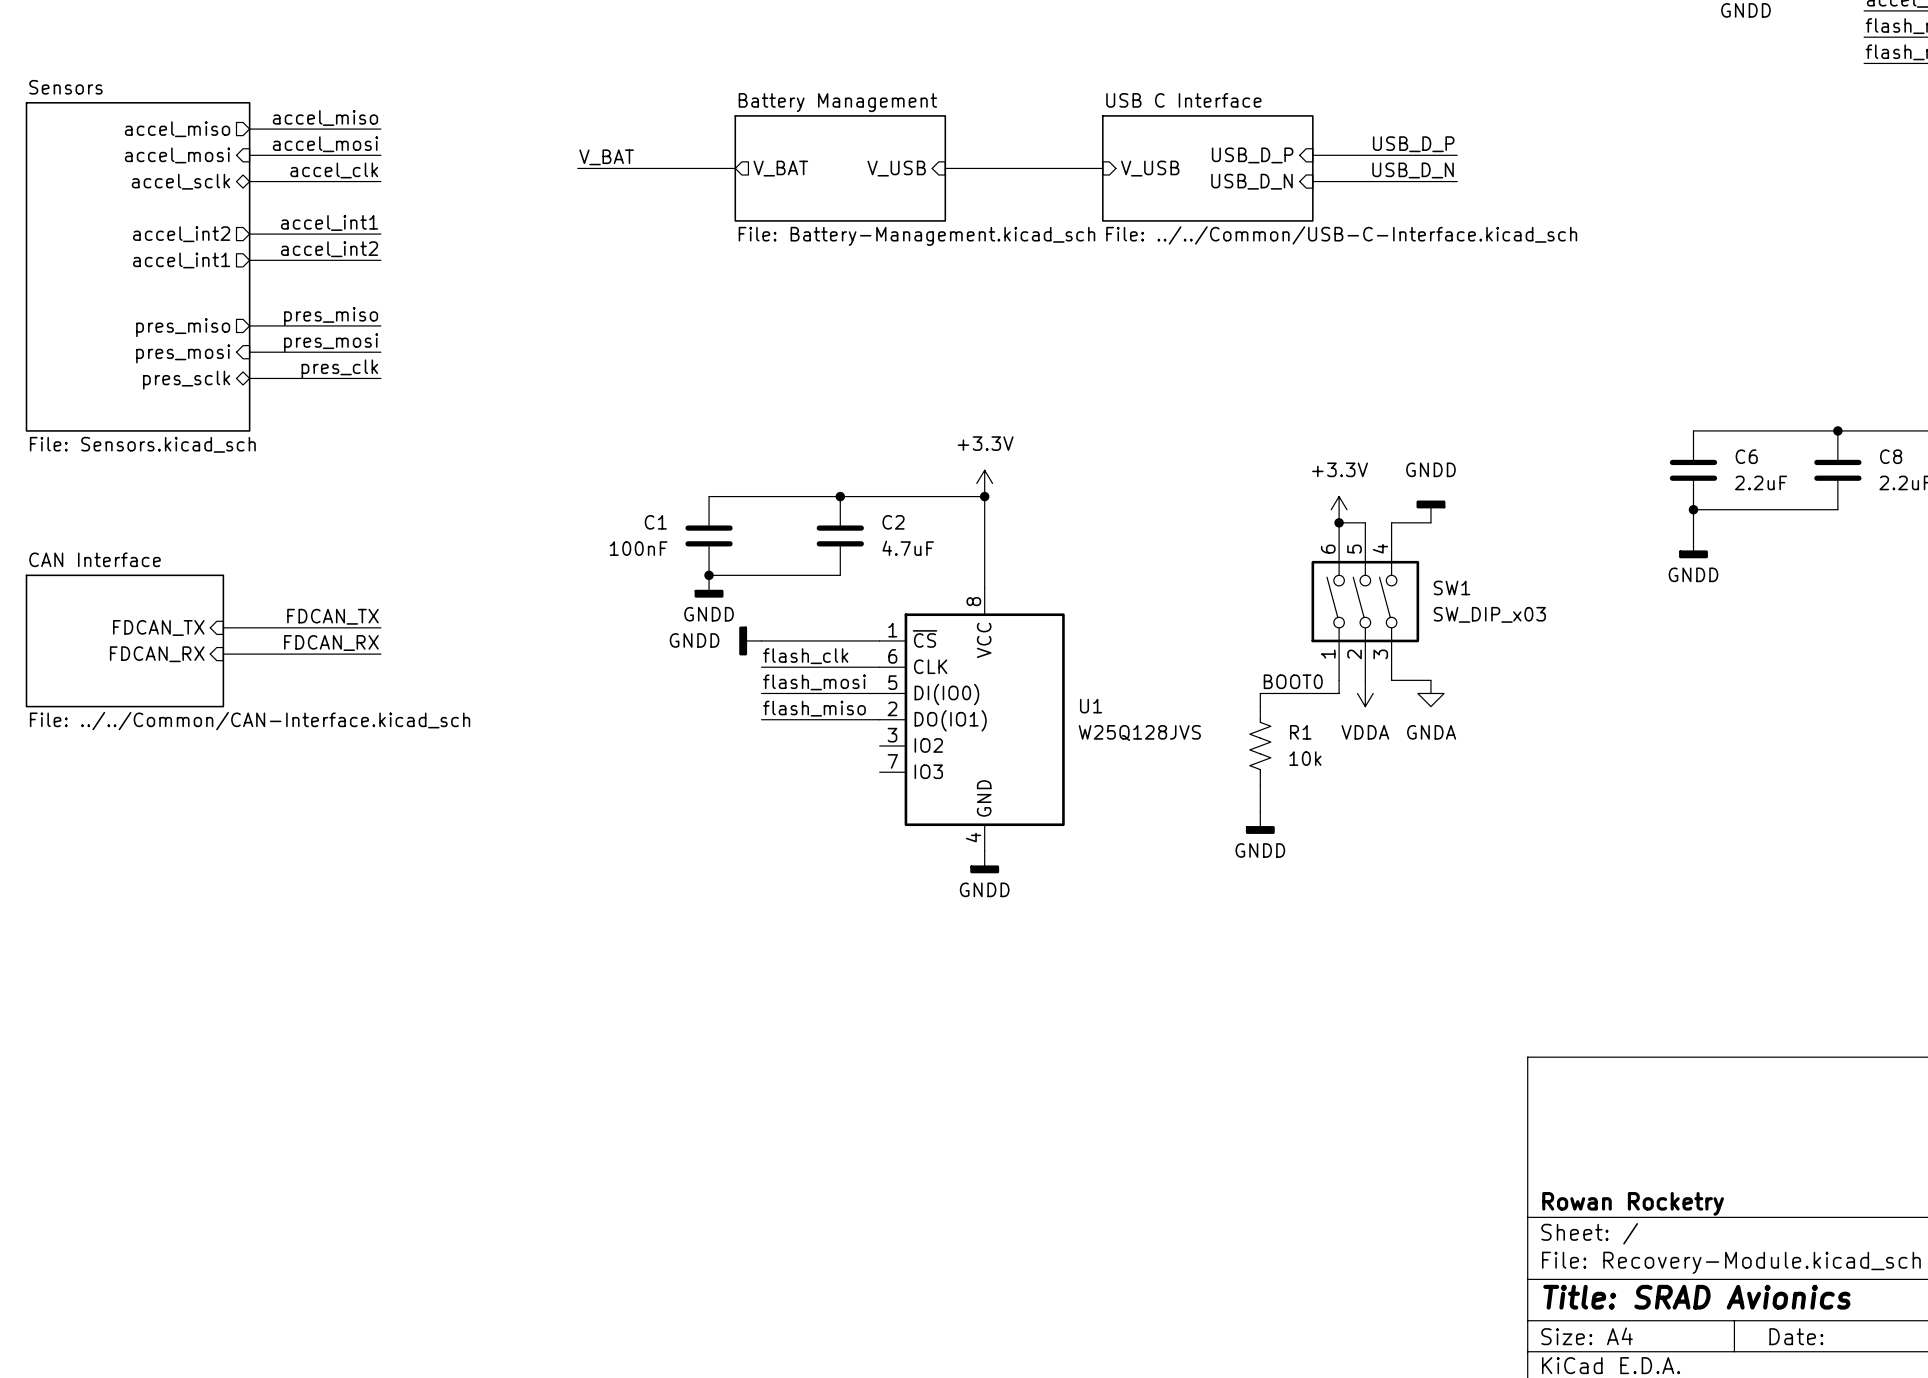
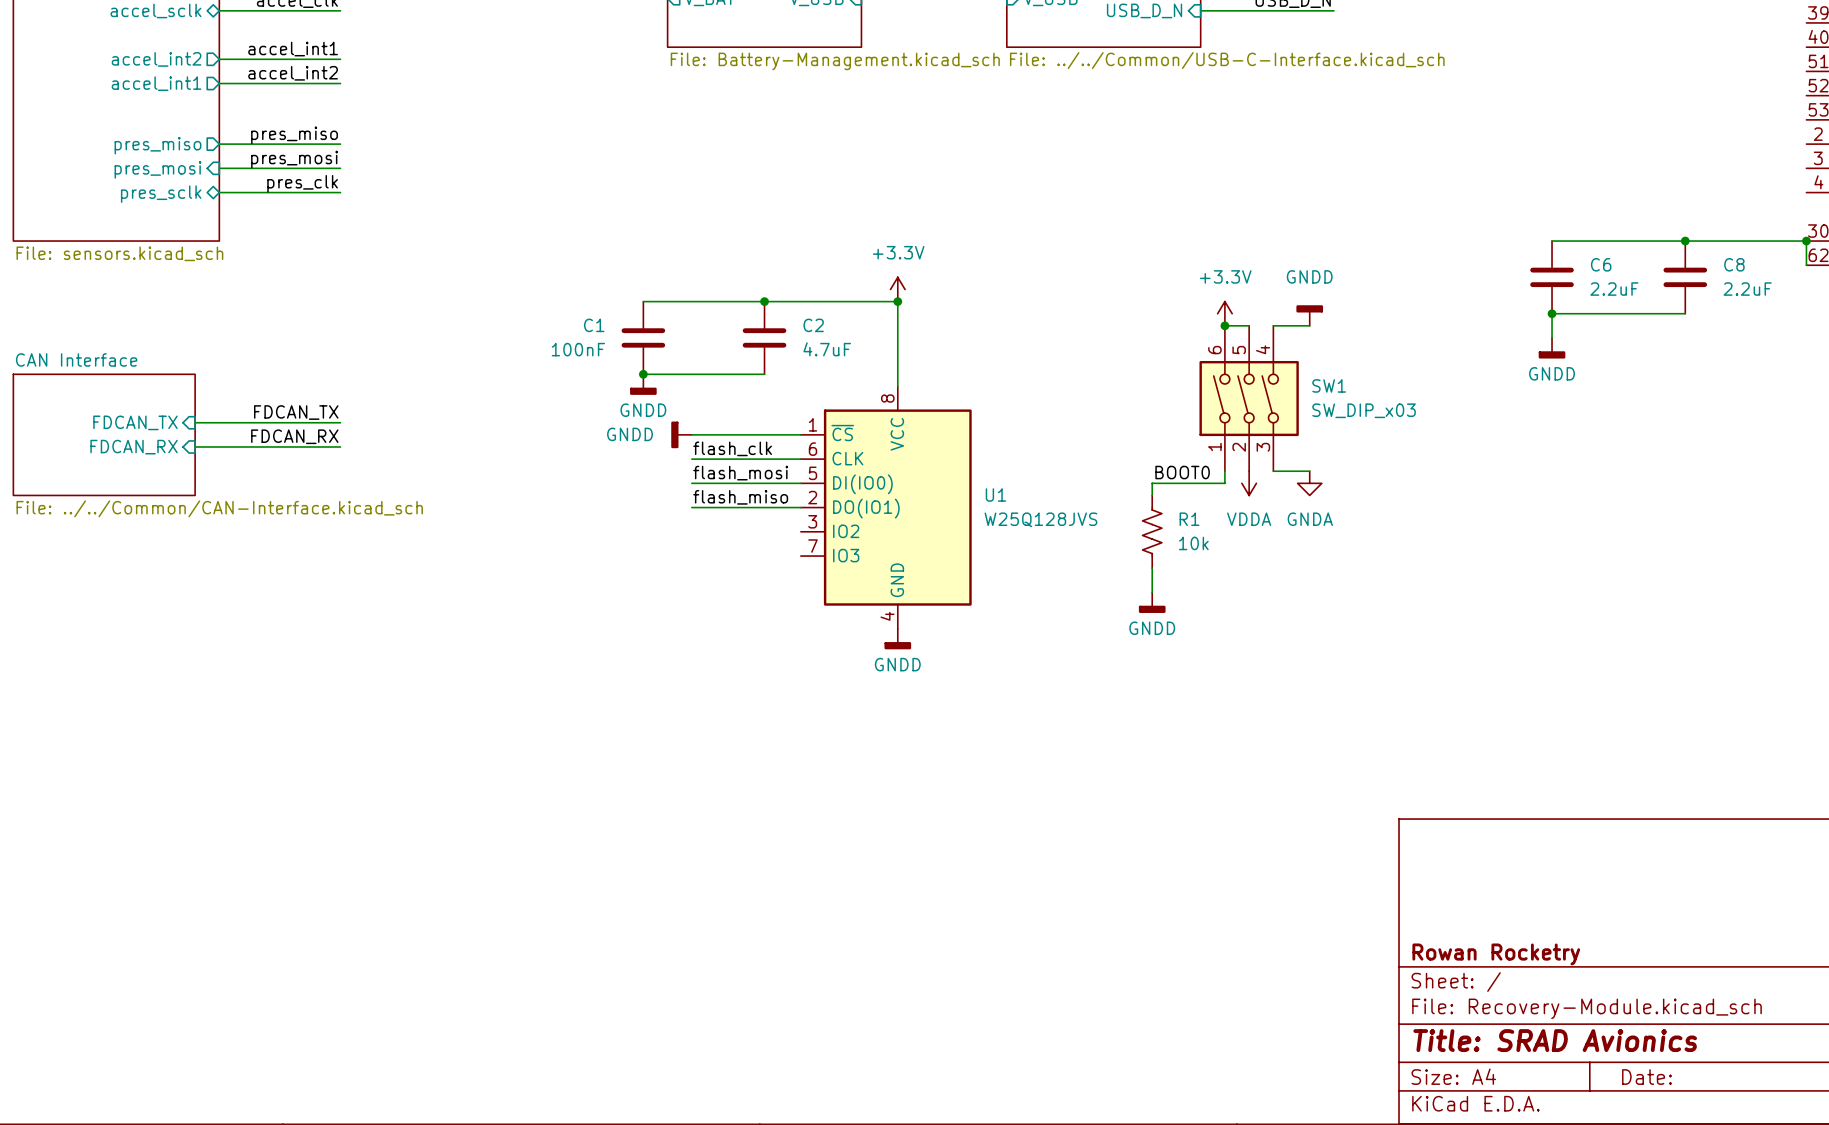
sheet Sensors value: File: Sensors.kicad_sch (142, 444) -> File: sensors.kicad_sch (119, 253)

